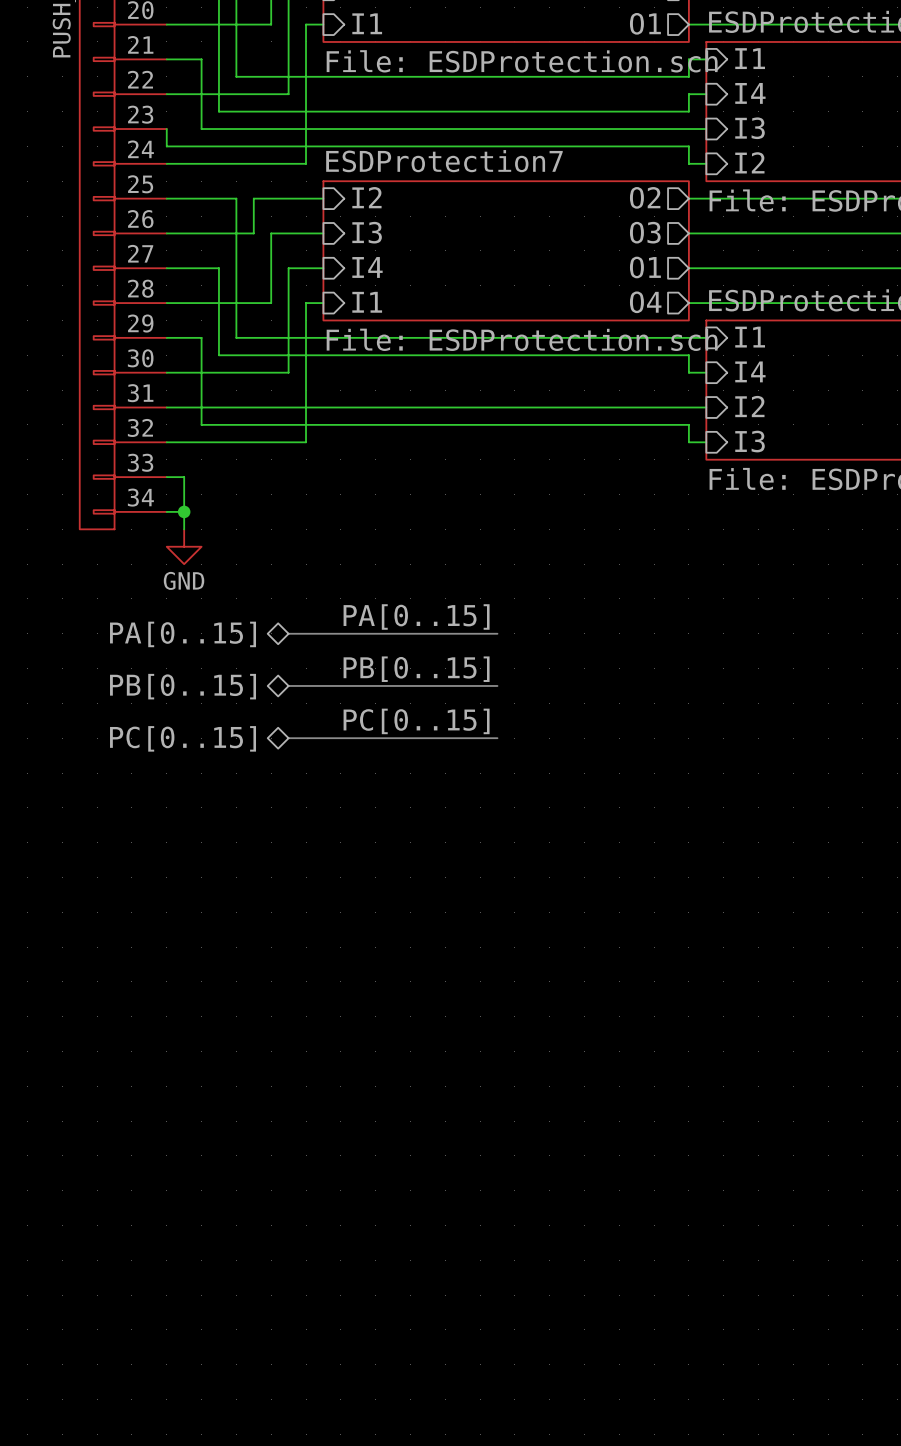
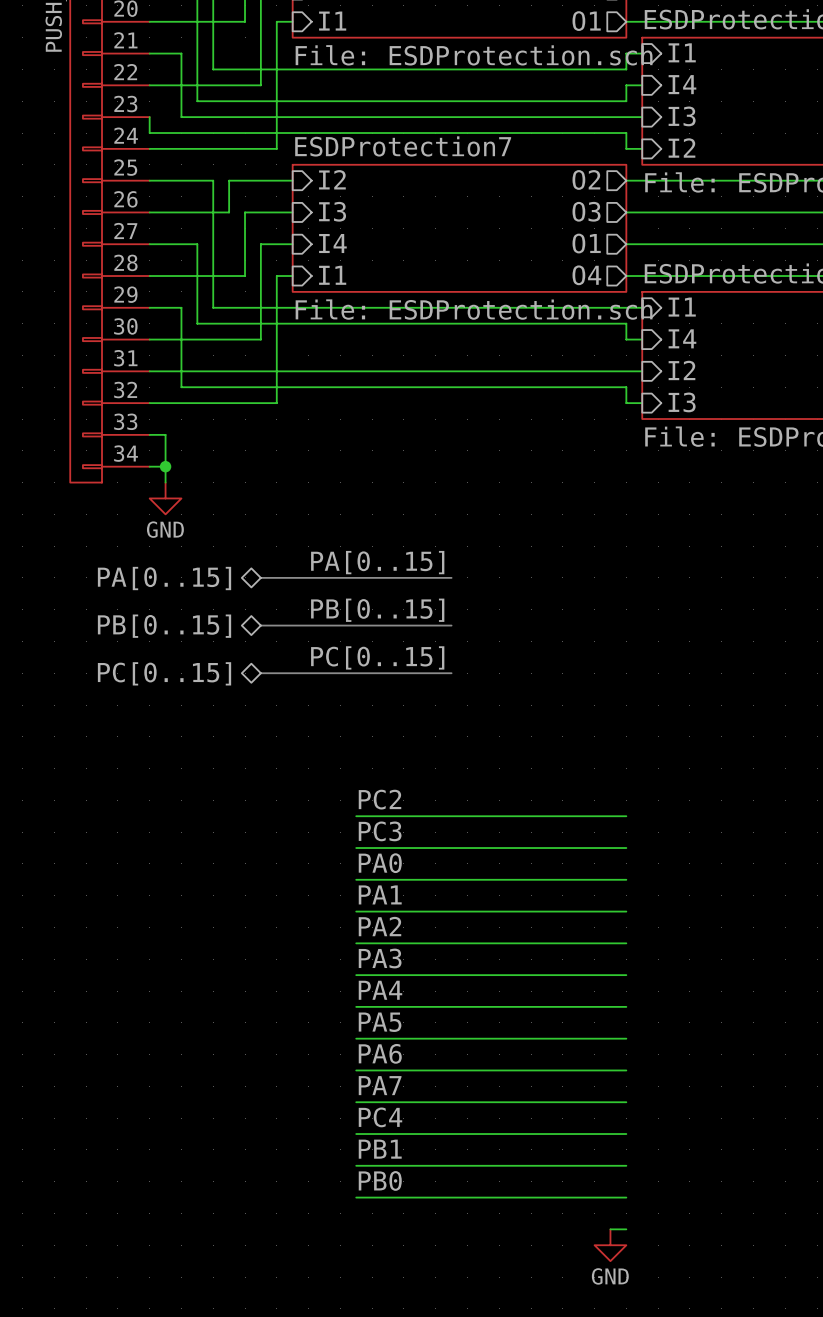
label: none -> PC2 (379, 799)
wire: none -> (356, 816) (626, 816)
label: none -> PC3 (380, 831)
wire: none -> (356, 848) (626, 848)
label: none -> PA0 (380, 863)
wire: none -> (356, 879) (626, 879)
label: none -> PA1 (380, 894)
wire: none -> (356, 911) (626, 911)
label: none -> PA2 (379, 926)
wire: none -> (356, 943) (626, 943)
label: none -> PA3 (380, 958)
wire: none -> (356, 975) (626, 975)
label: none -> PA4 (380, 990)
wire: none -> (356, 1006) (626, 1006)
label: none -> PA5 (380, 1022)
wire: none -> (356, 1038) (626, 1038)
label: none -> PA6 (380, 1053)
wire: none -> (356, 1070) (626, 1070)
label: none -> PA7 (380, 1085)
wire: none -> (356, 1102) (626, 1102)
label: none -> PC4 (380, 1117)
wire: none -> (356, 1134) (626, 1134)
label: none -> PB1 (380, 1149)
wire: none -> (356, 1165) (626, 1165)
label: none -> PB0 (380, 1180)
wire: none -> (356, 1197) (626, 1197)
wire: none -> (610, 1229) (626, 1229)
power symbol: none -> GND (610, 1245)

